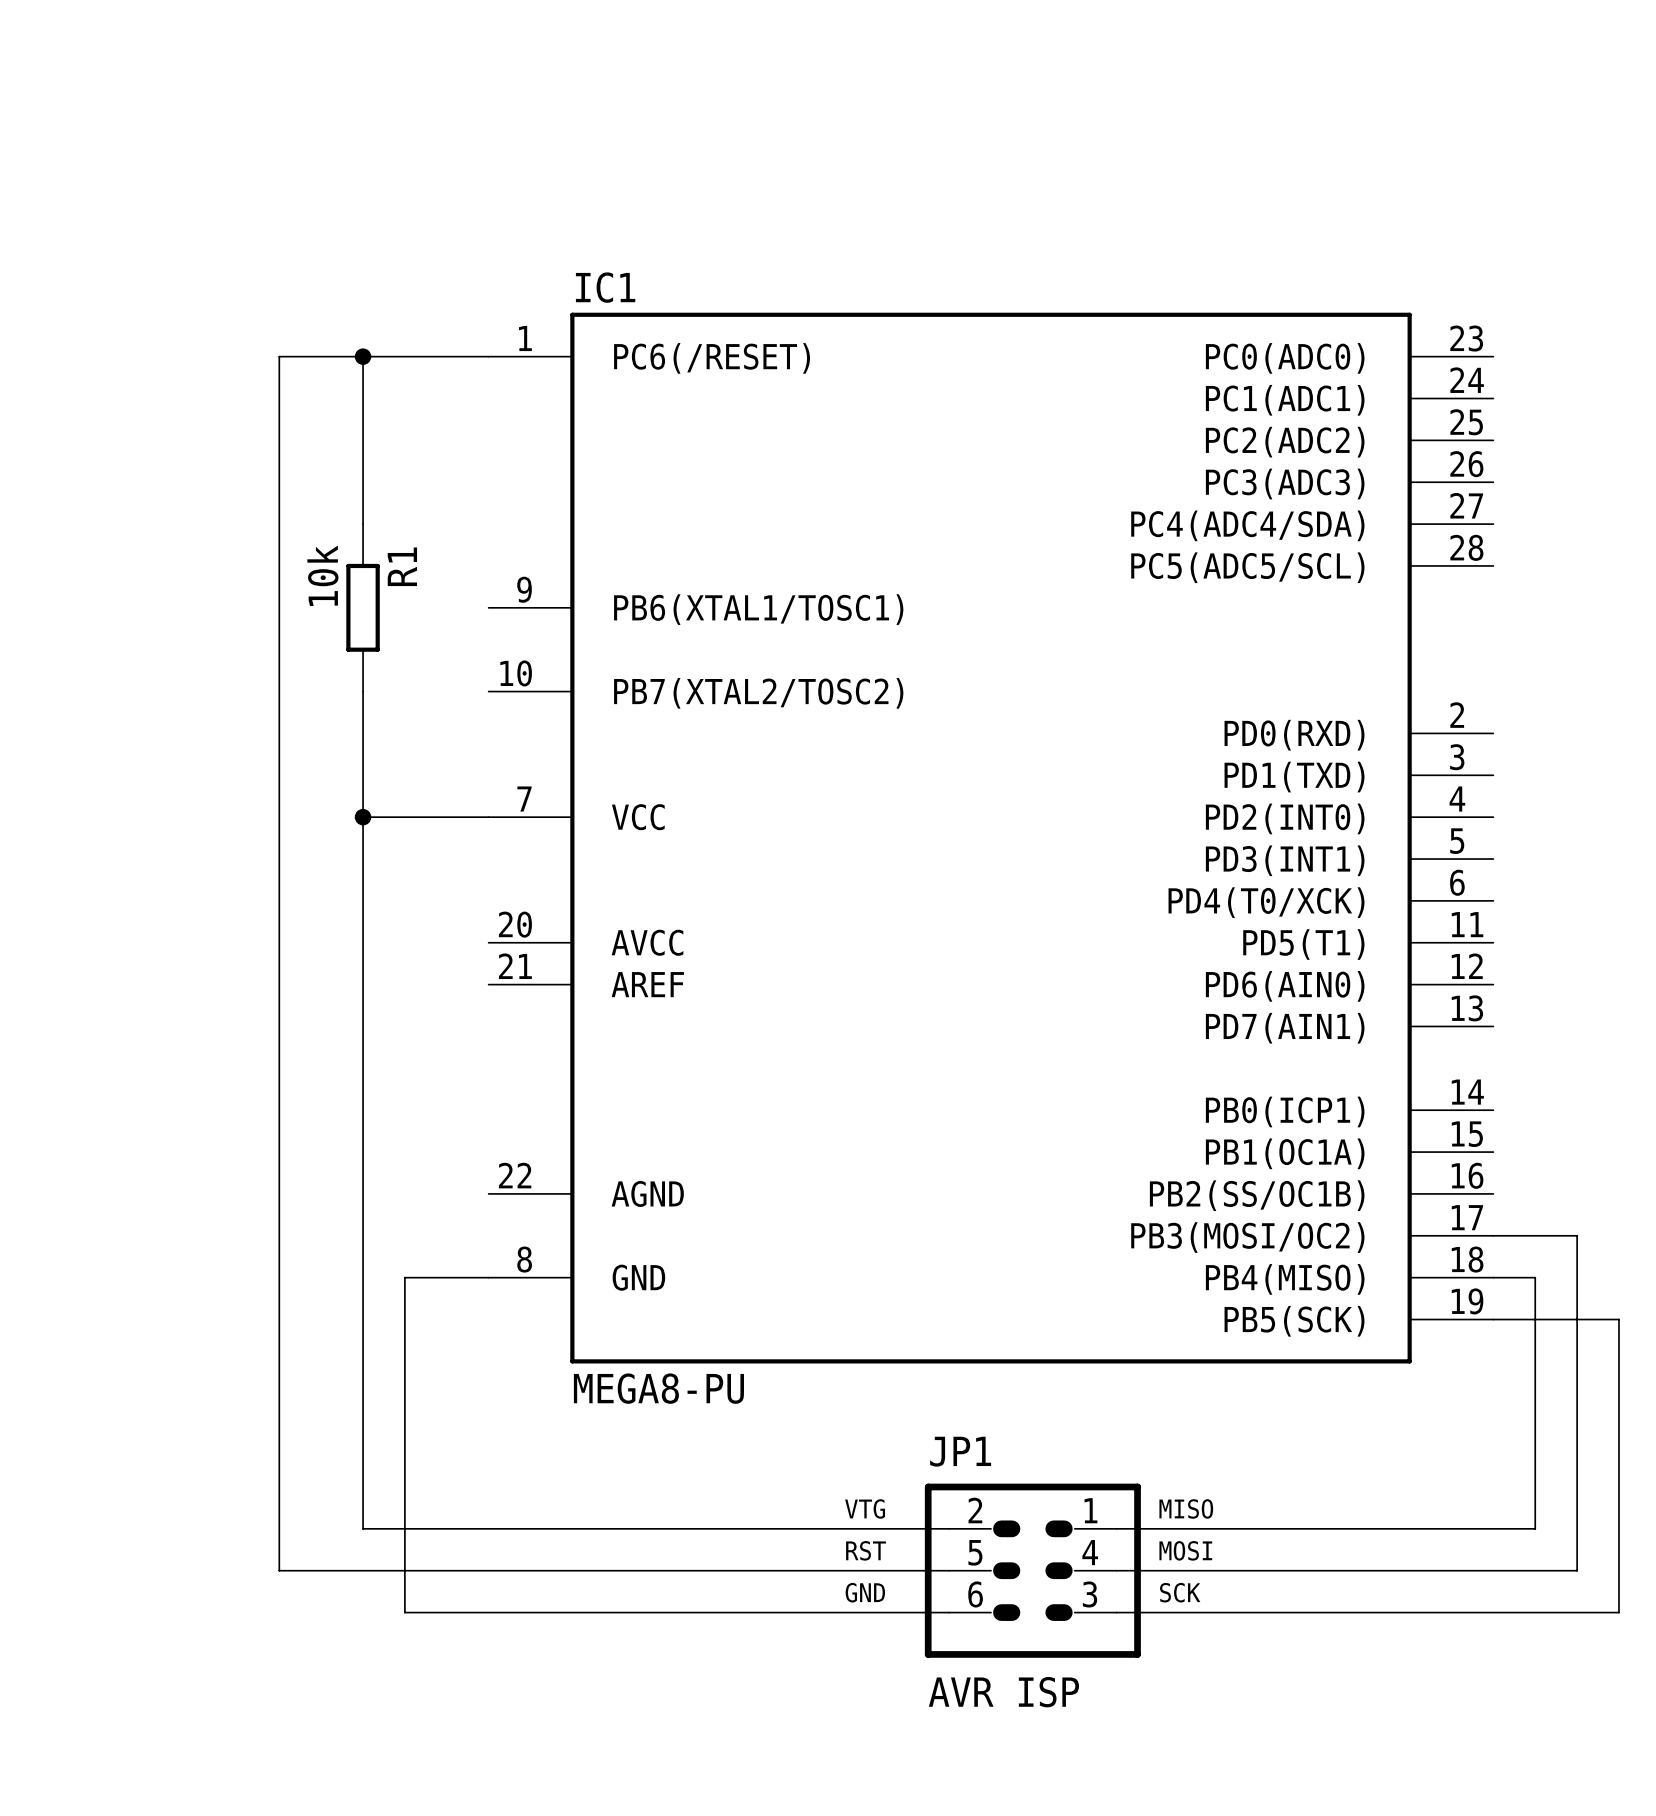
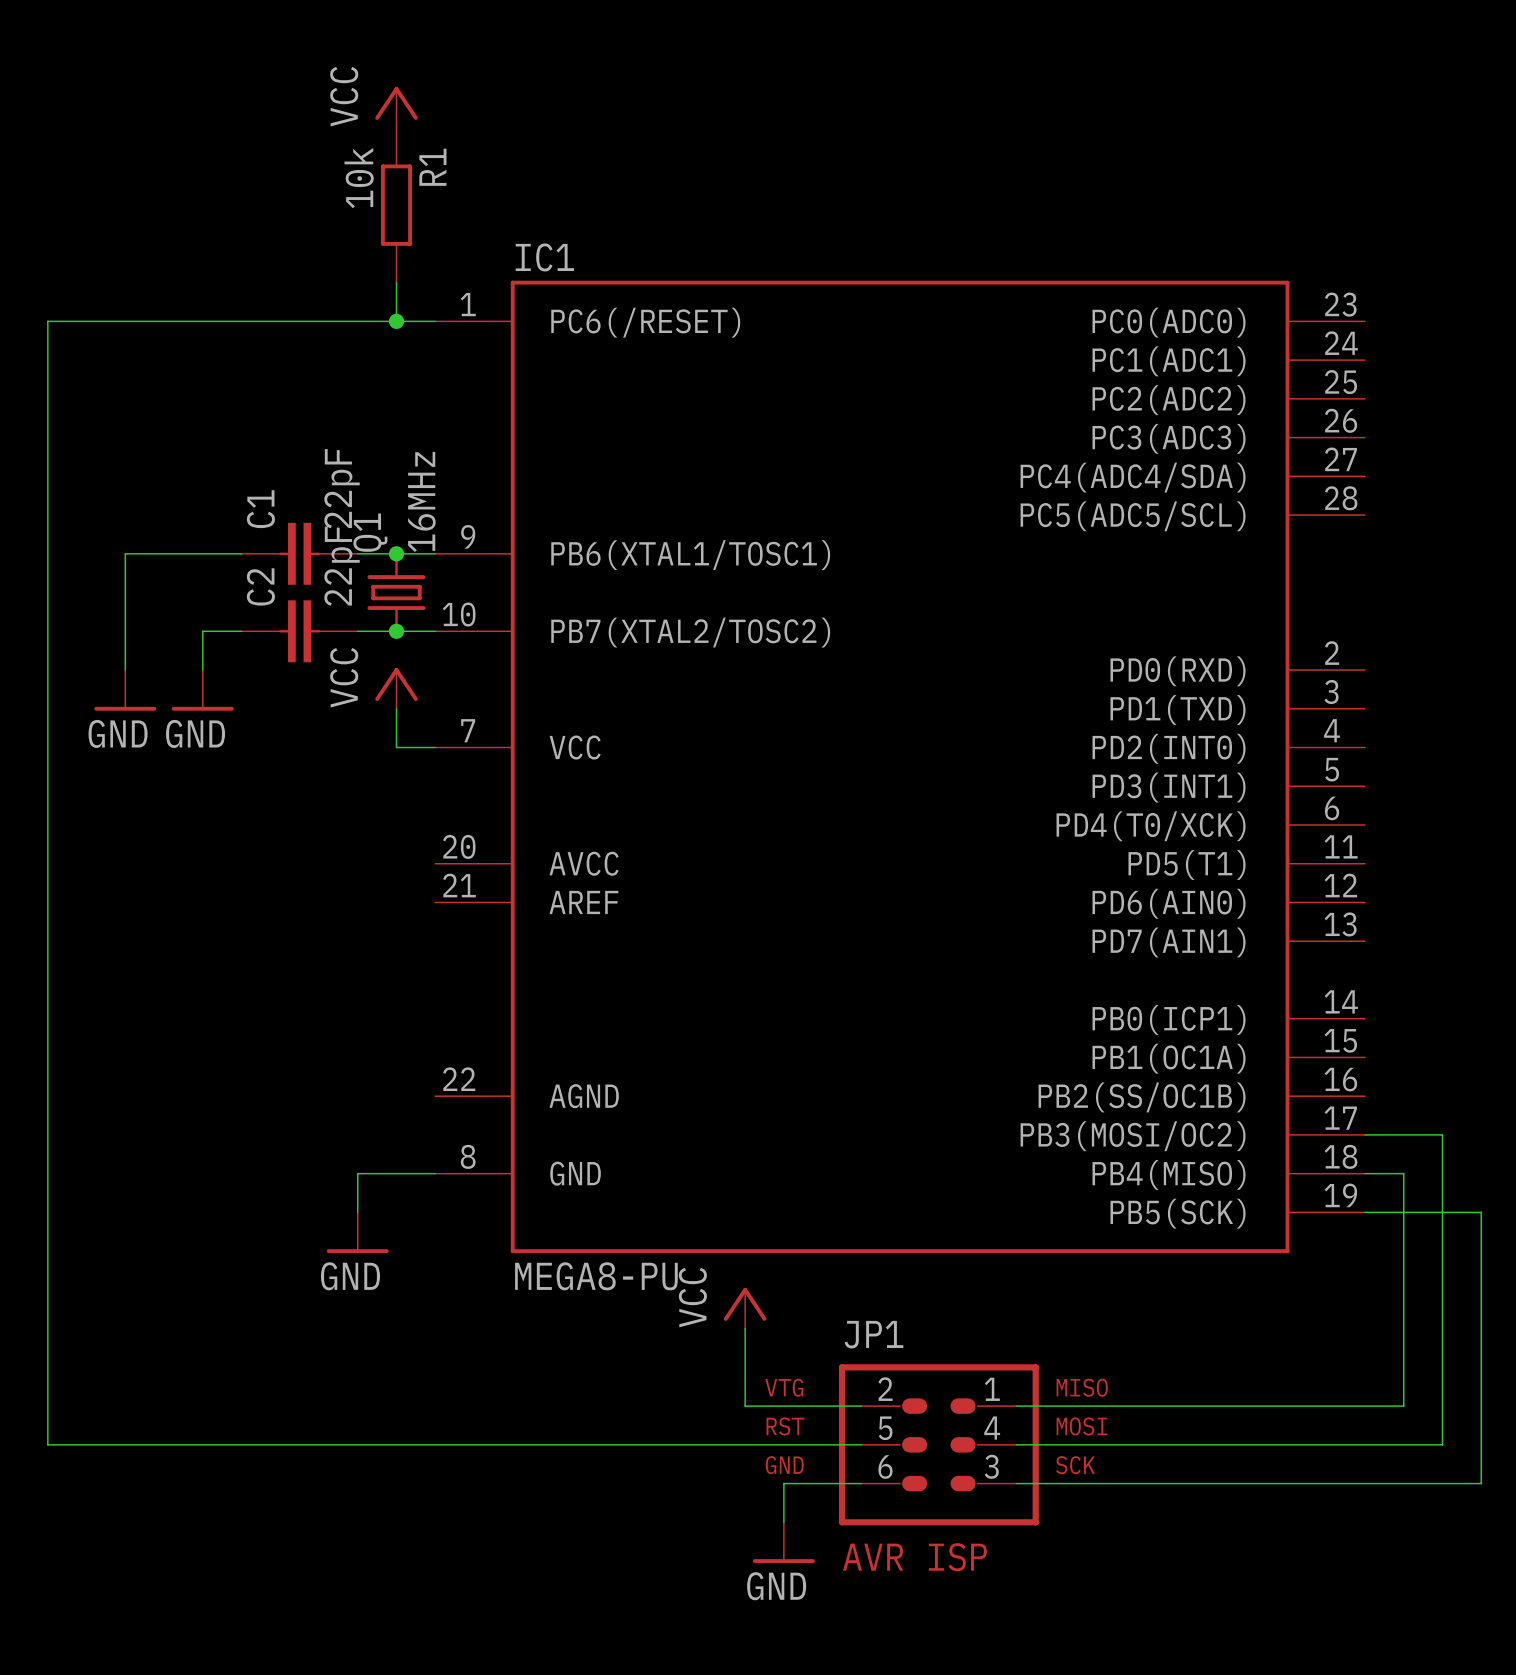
power symbol: none -> VCC (396, 107)
wire: none -> (396, 282) (396, 321)
wire: (279, 356) (279, 1570) -> (241, 321) (47, 321) (47, 1444) (241, 1444)
wire: (363, 356) (363, 524) -> none
junction position: (363, 356) -> (396, 321)
wire: none -> (241, 553) (125, 553) (125, 670)
C1: none -> 22pF (299, 553)
R1 position: (363, 607) -> (396, 205)
wire: none -> (357, 553) (435, 553)
junction: none -> (396, 553)
Q1: none -> 16MHz (396, 592)
wire: none -> (241, 631) (202, 631) (202, 670)
C2: none -> 22pF (299, 631)
wire: (363, 691) (363, 1528) (823, 1528) -> (745, 1328) (745, 1406)
wire: none -> (357, 631) (435, 631)
junction: none -> (396, 631)
power symbol: none -> VCC (396, 688)
power symbol: none -> GND (125, 690)
power symbol: none -> GND (202, 690)
wire: (363, 817) (446, 817) -> (396, 708) (396, 747)
junction: (363, 817) -> none
wire: (404, 1319) (404, 1612) (865, 1612) -> (783, 1522) (783, 1483)
power symbol: none -> GND (357, 1232)
power symbol: none -> VCC (745, 1308)
power symbol: none -> GND (783, 1542)

